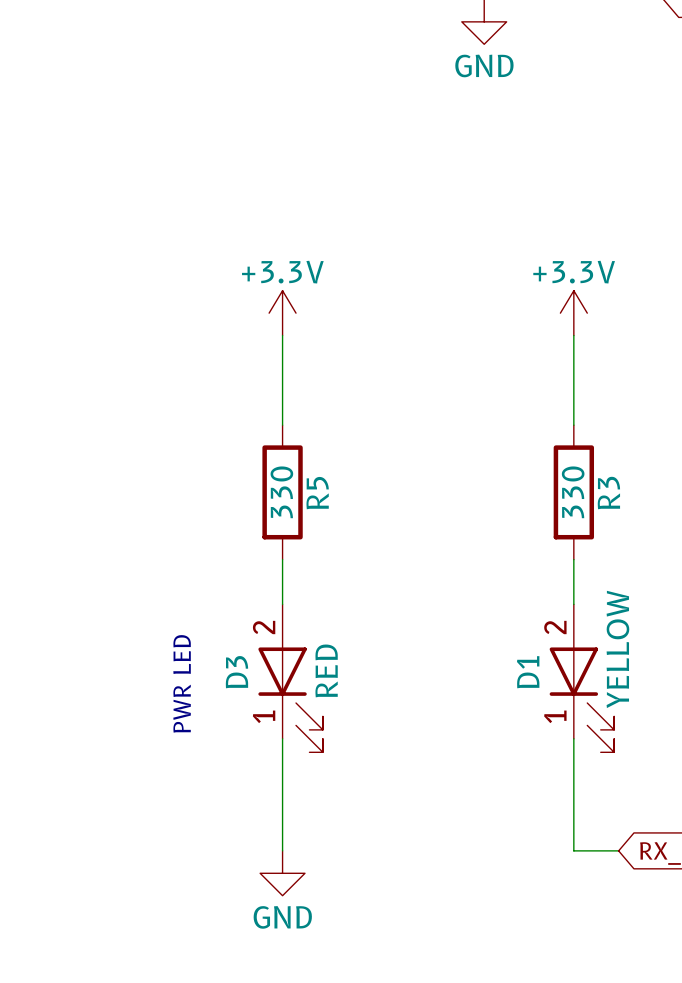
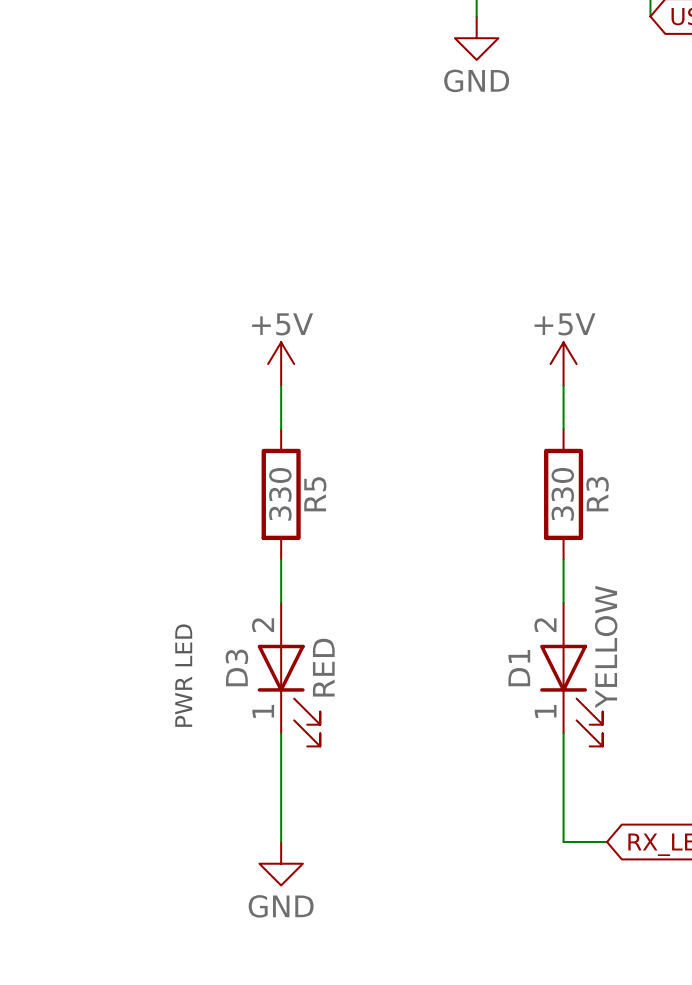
power symbol: +3.3V (282, 313) -> none
power symbol: +3.3V (573, 313) -> none
power symbol: none -> +5V (281, 364)
power symbol: none -> +5V (563, 364)

